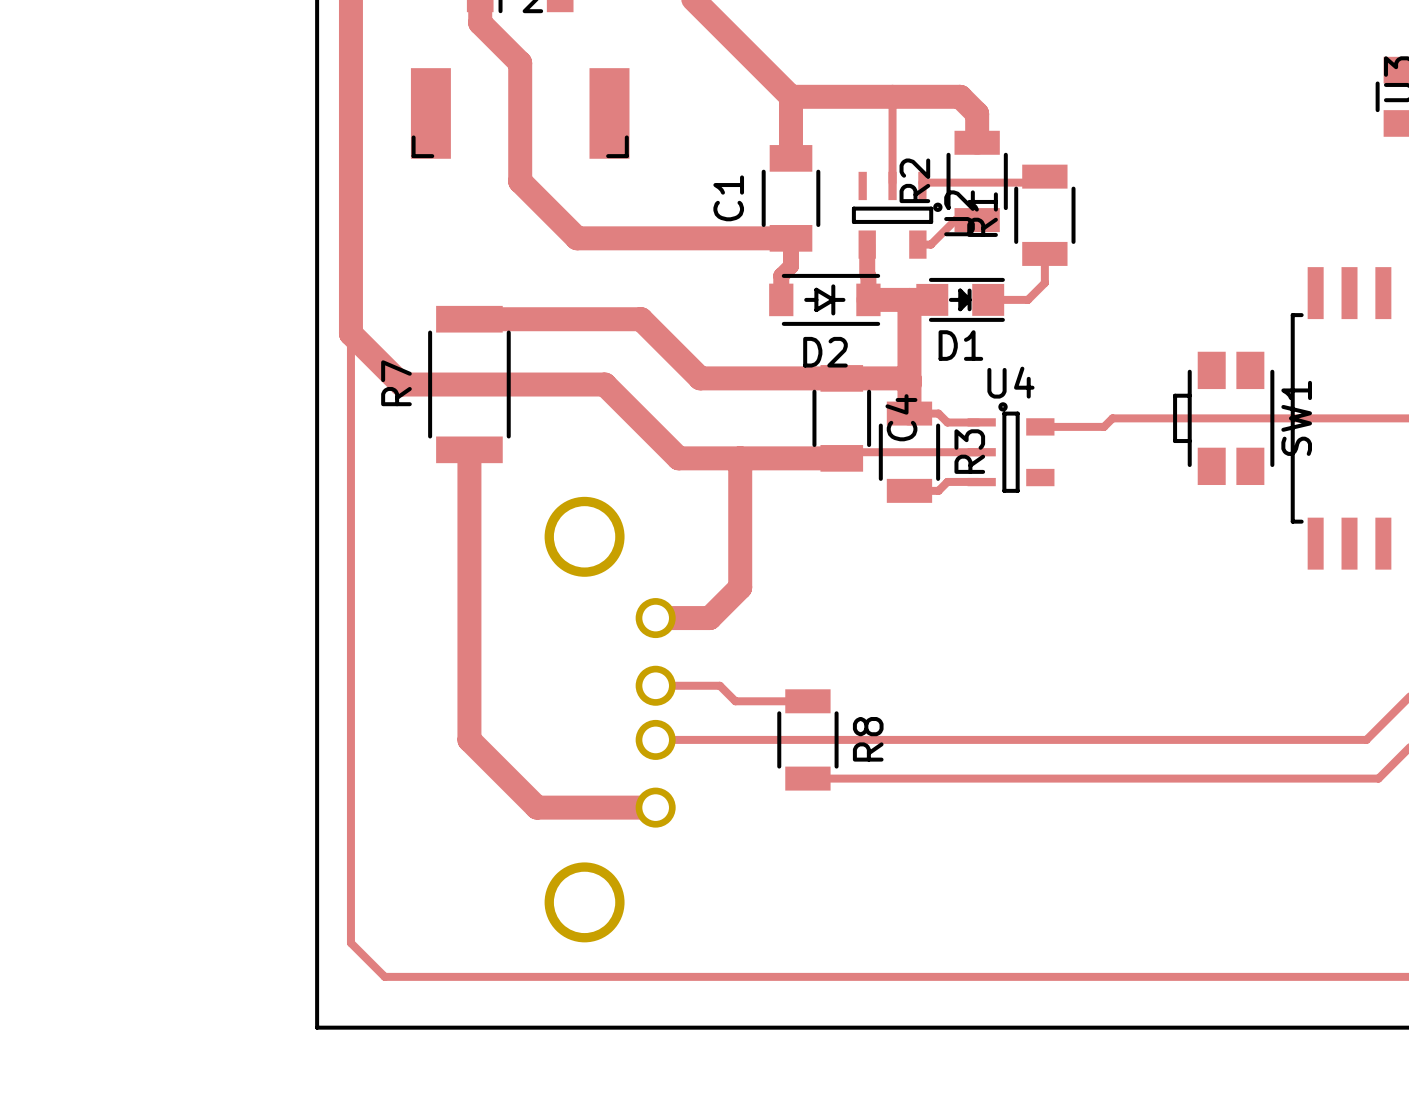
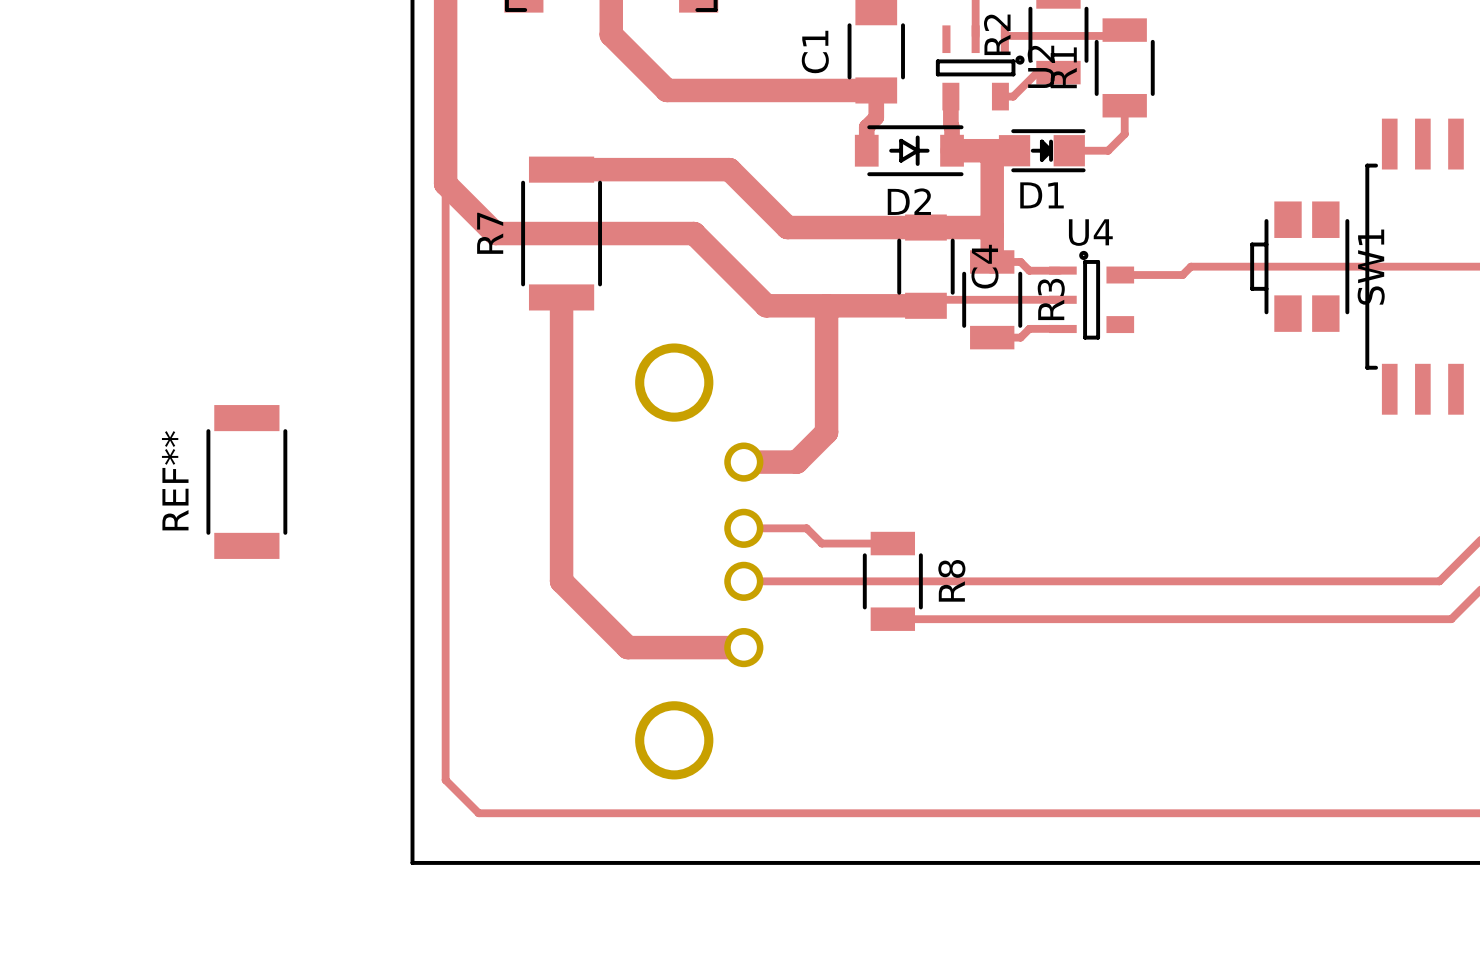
REF**: none -> (246, 481)

